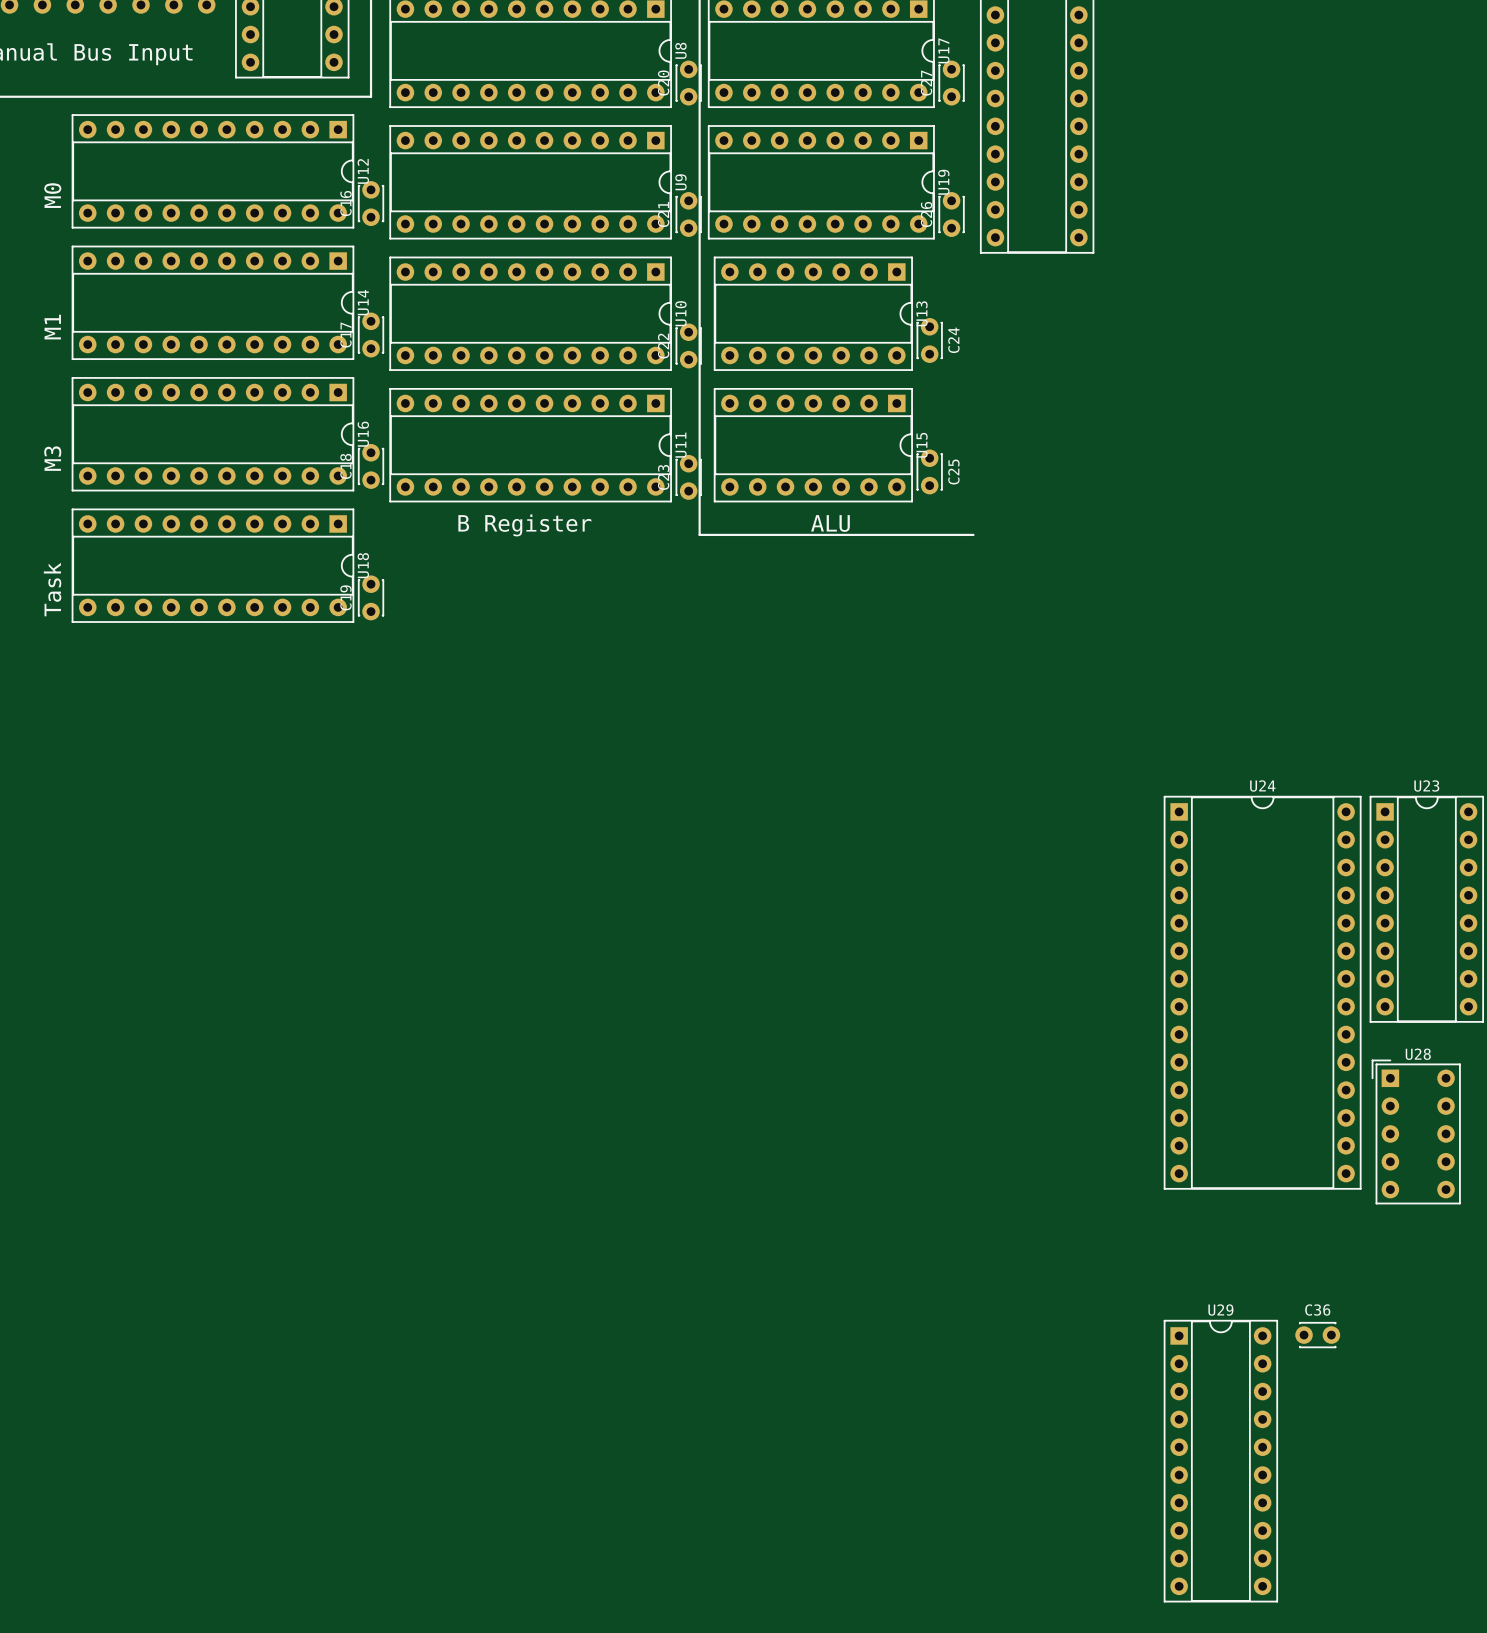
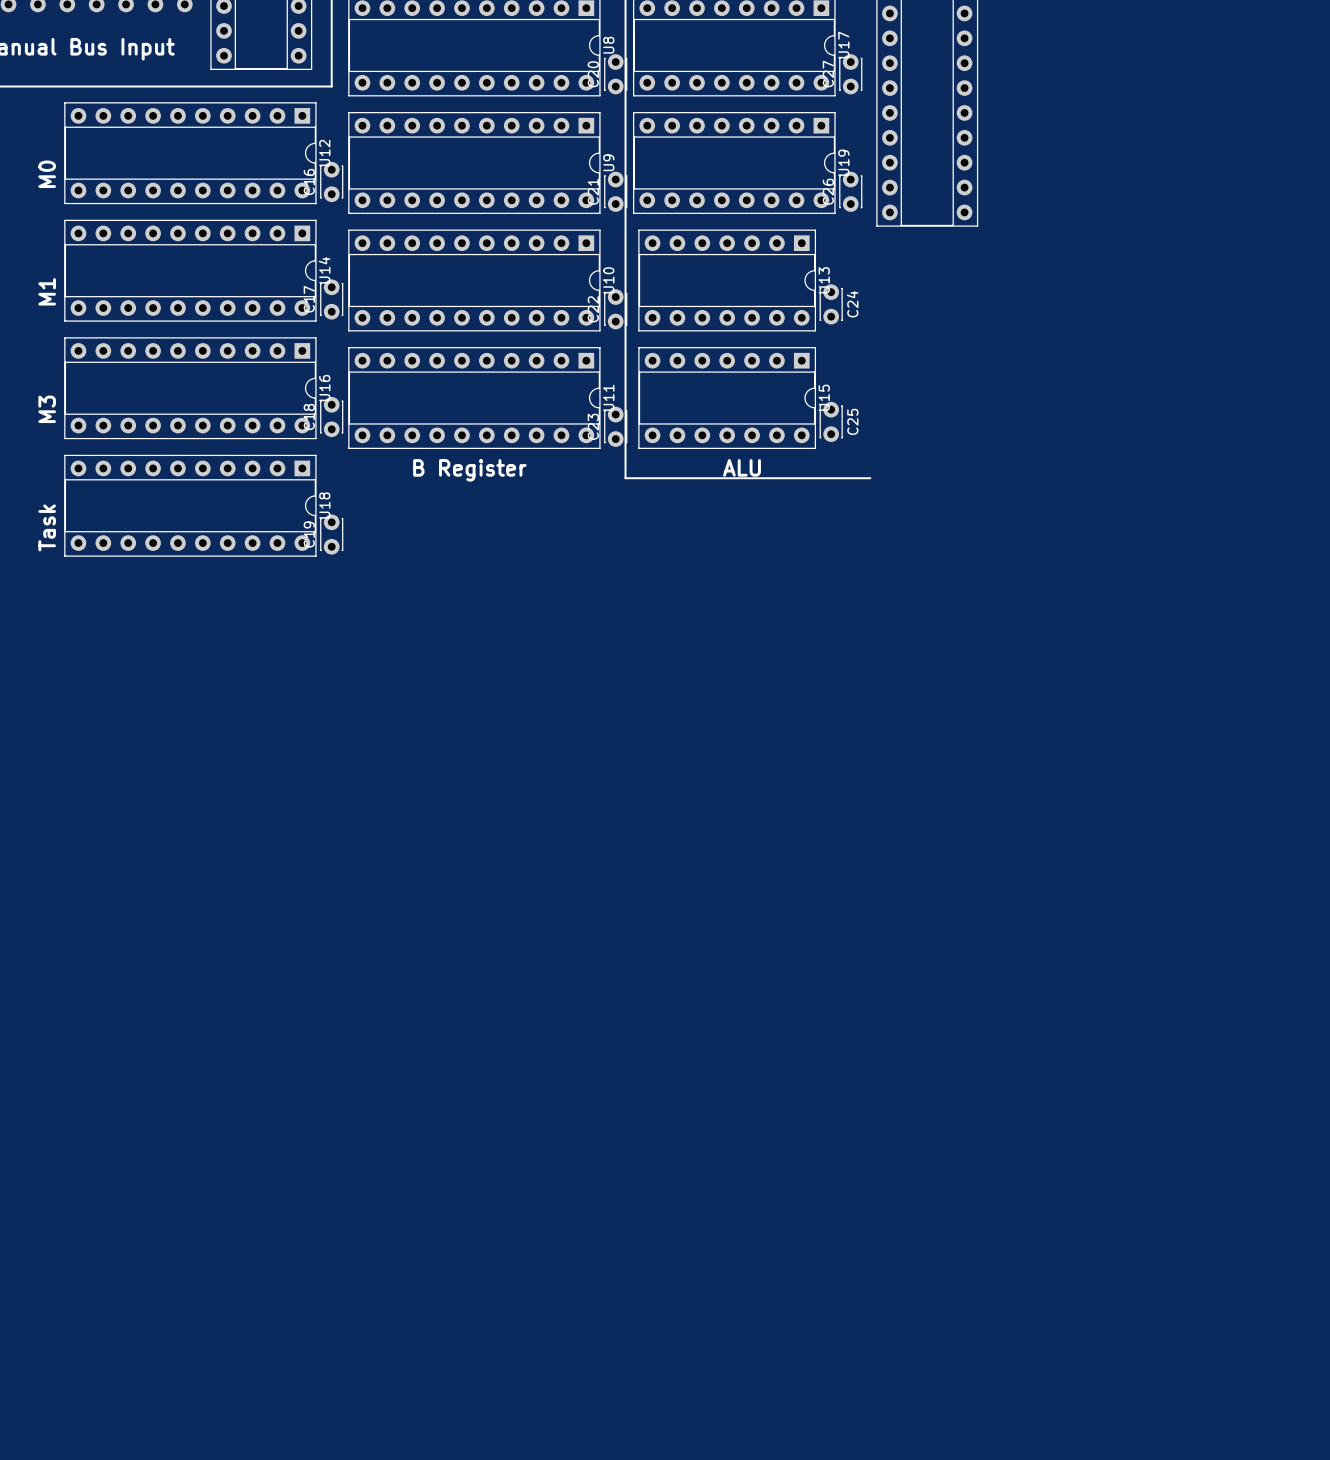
U23: (1426, 909) -> none
U24: (1262, 992) -> none
U28: (1416, 1132) -> none
C36: (1317, 1335) -> none
U29: (1220, 1461) -> none

